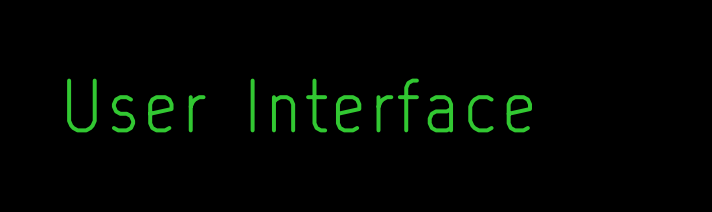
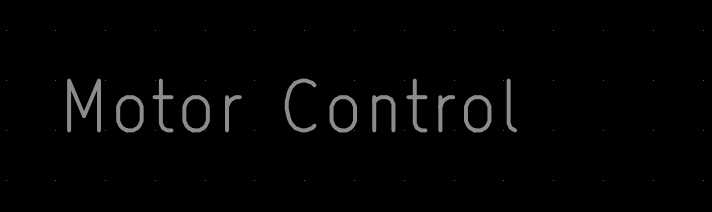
text: User Interface (299, 105) -> Motor Control (292, 105)

